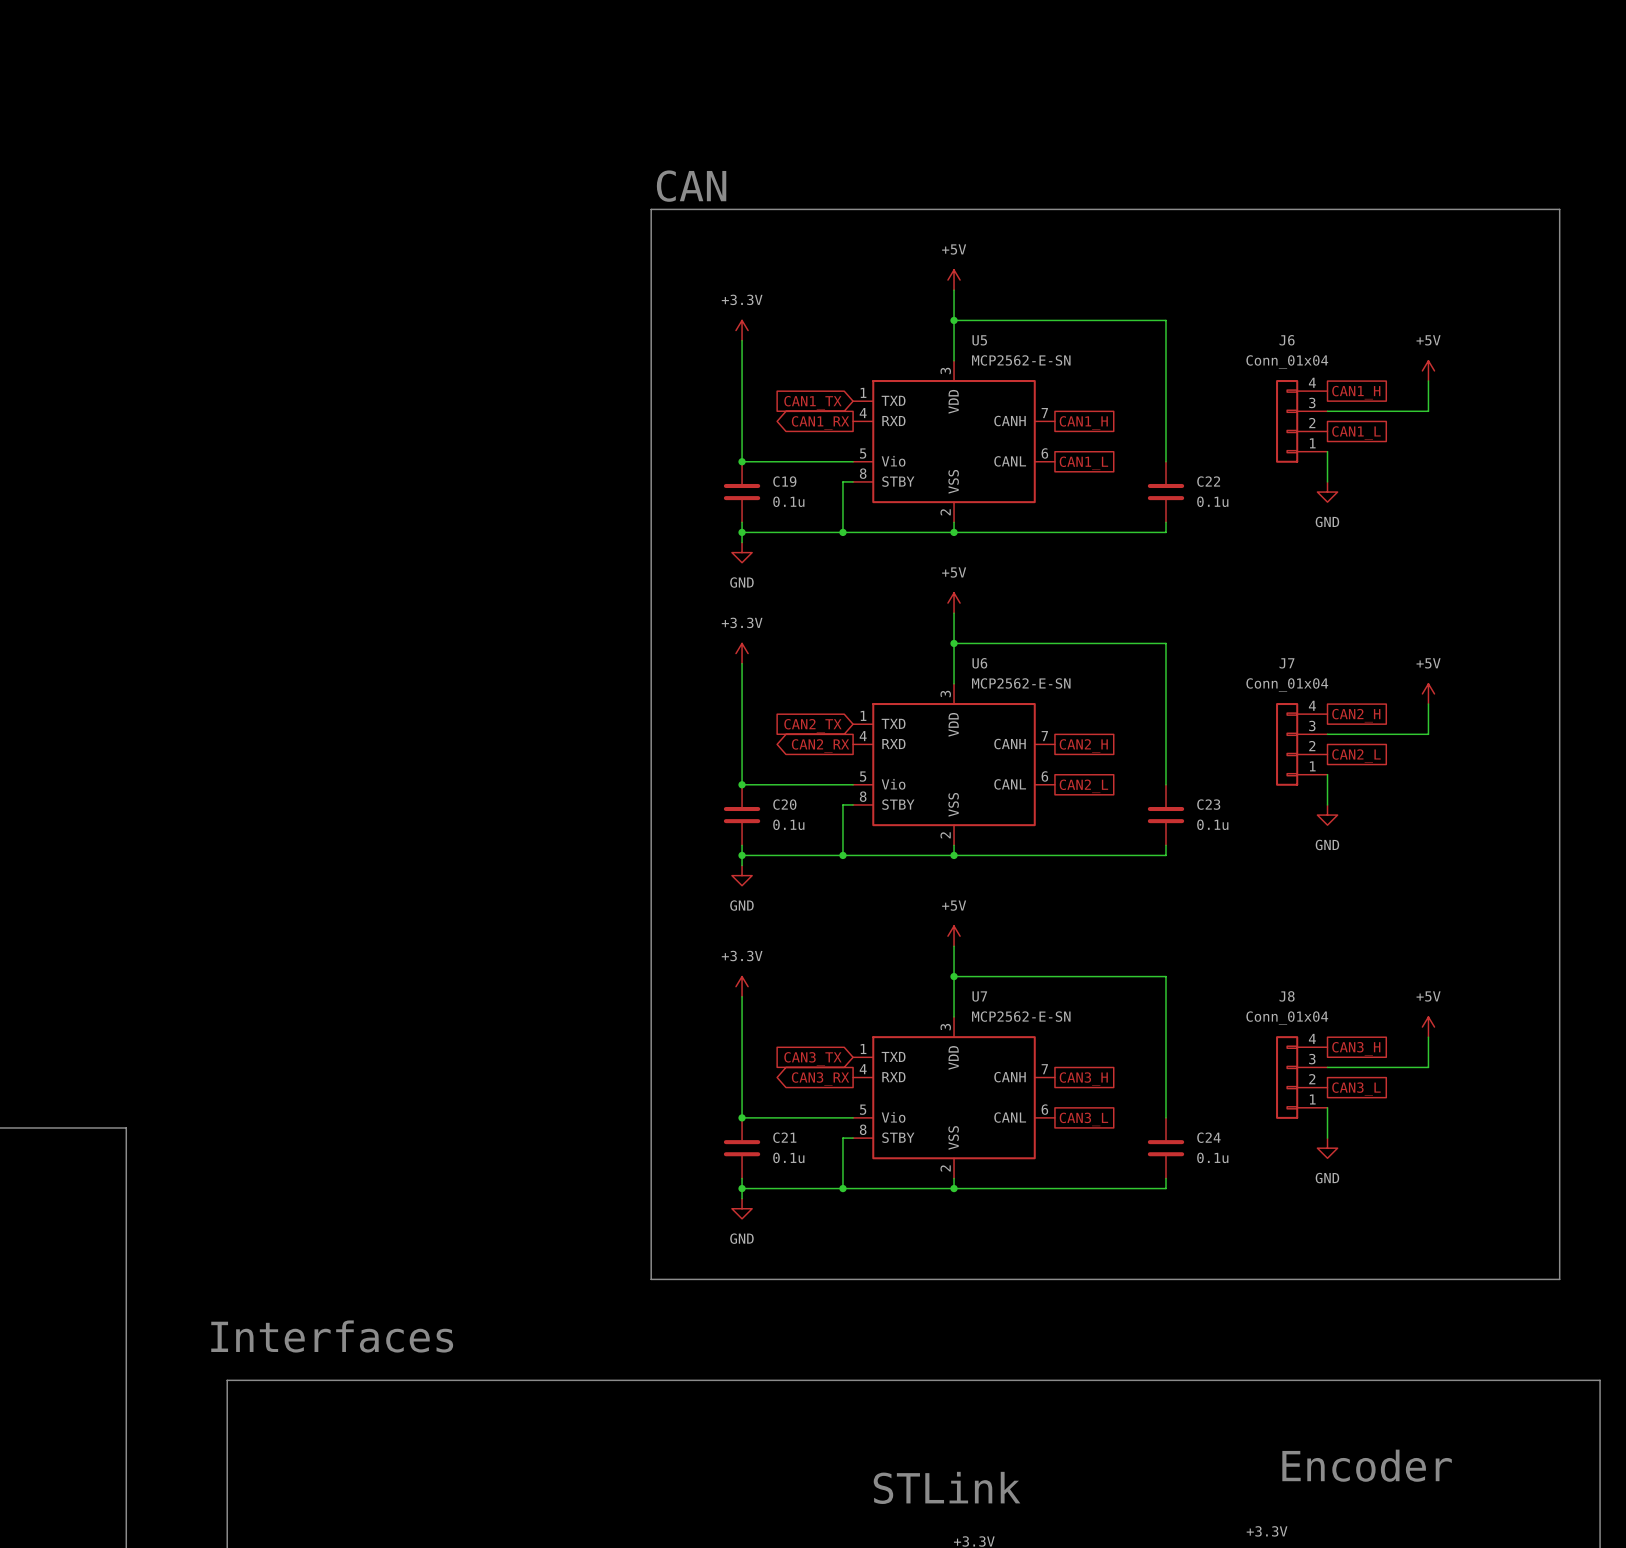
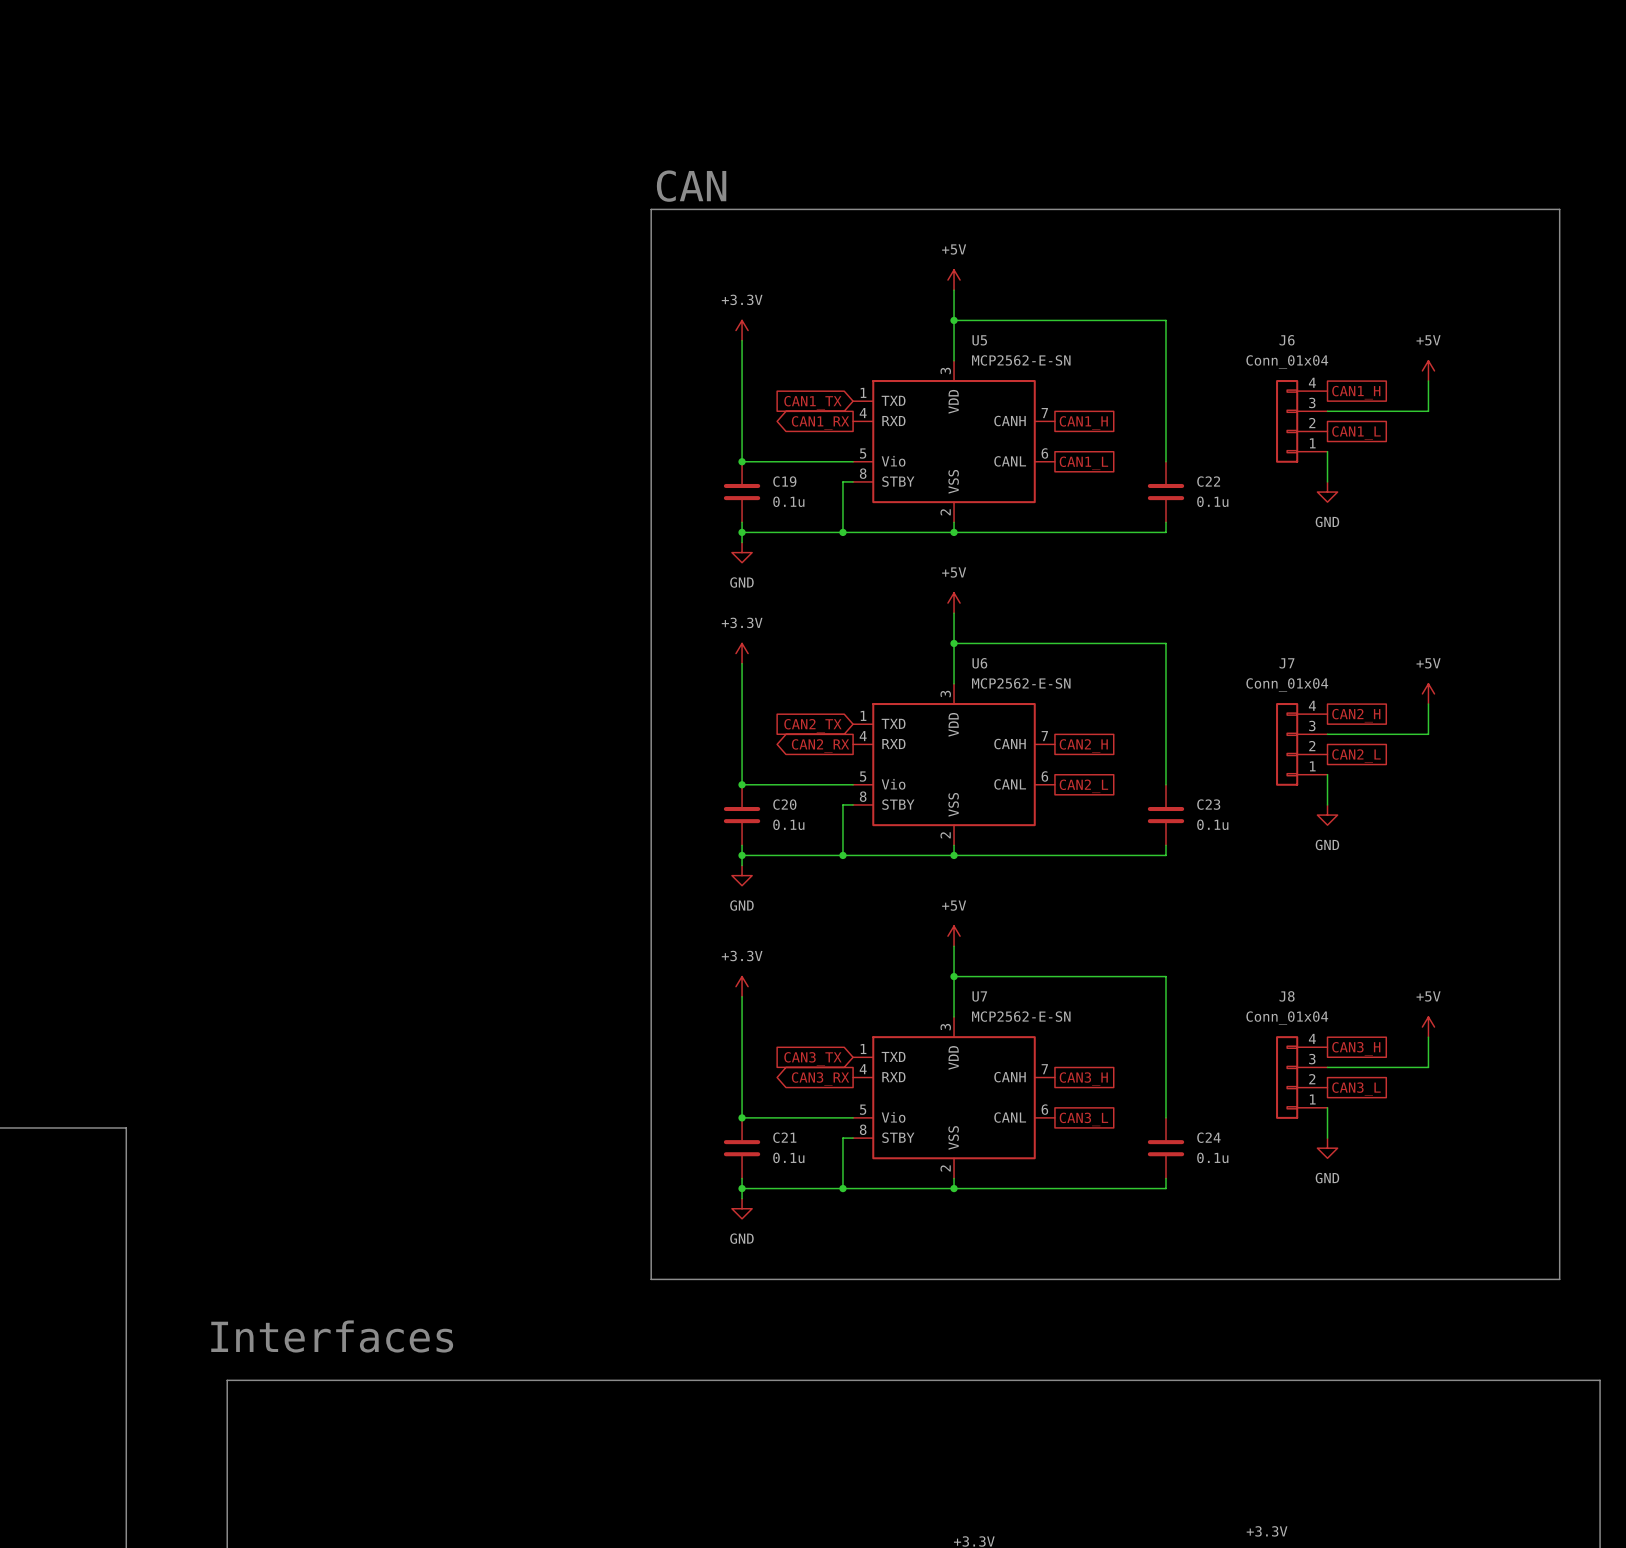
text: Encoder (1367, 1465) -> none
text: STLink (947, 1487) -> none

